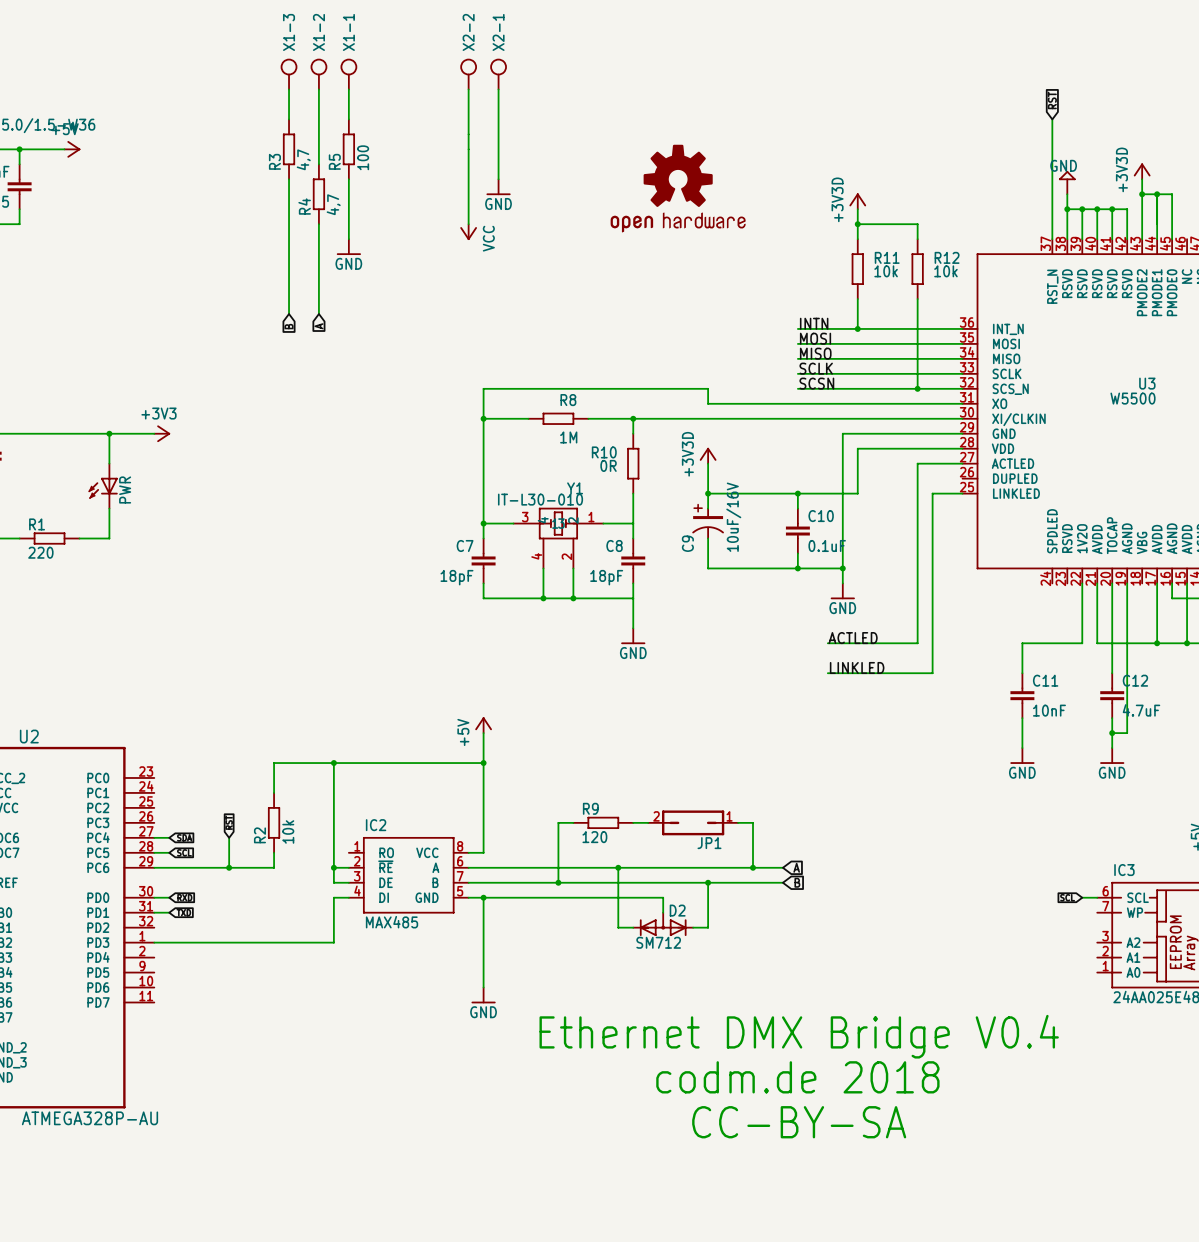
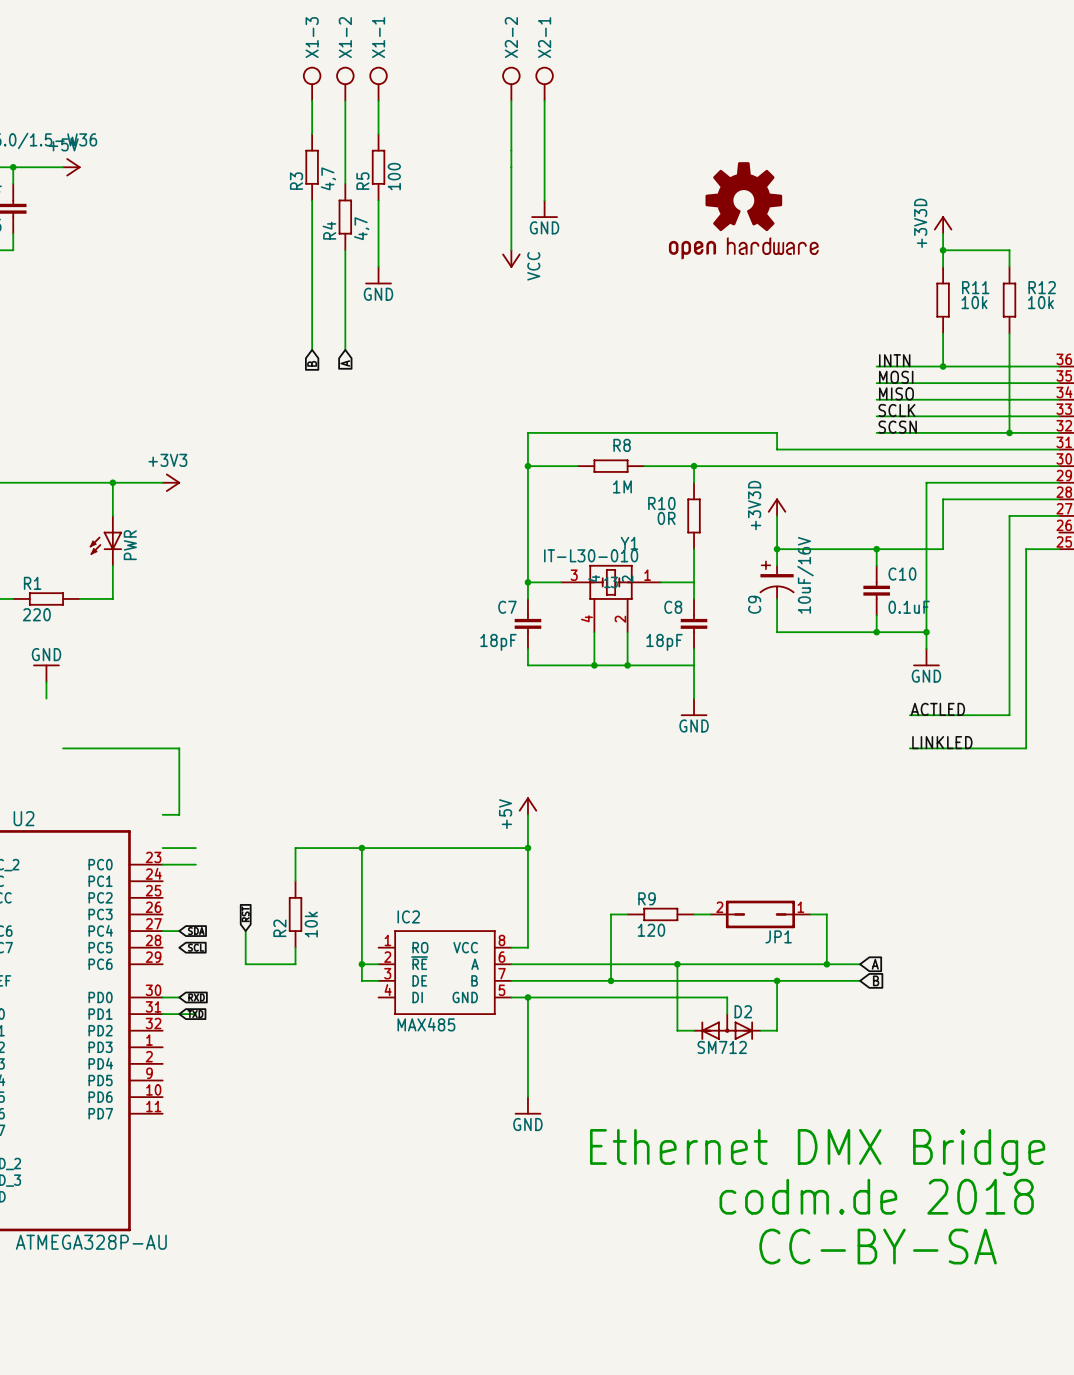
power symbol: none -> GND (46, 673)
wire: none -> (46, 682) (46, 698)
wire: none -> (63, 748) (179, 748) (179, 814) (162, 814)
wire: none -> (162, 848) (195, 848)
wire: none -> (162, 864) (195, 864)
wire: (154, 852) (169, 852) -> (179, 1014) (195, 1014)
wire: (154, 867) (229, 867) -> none
junction: (229, 867) -> none
wire: (348, 897) (333, 897) (333, 942) (154, 942) -> none

